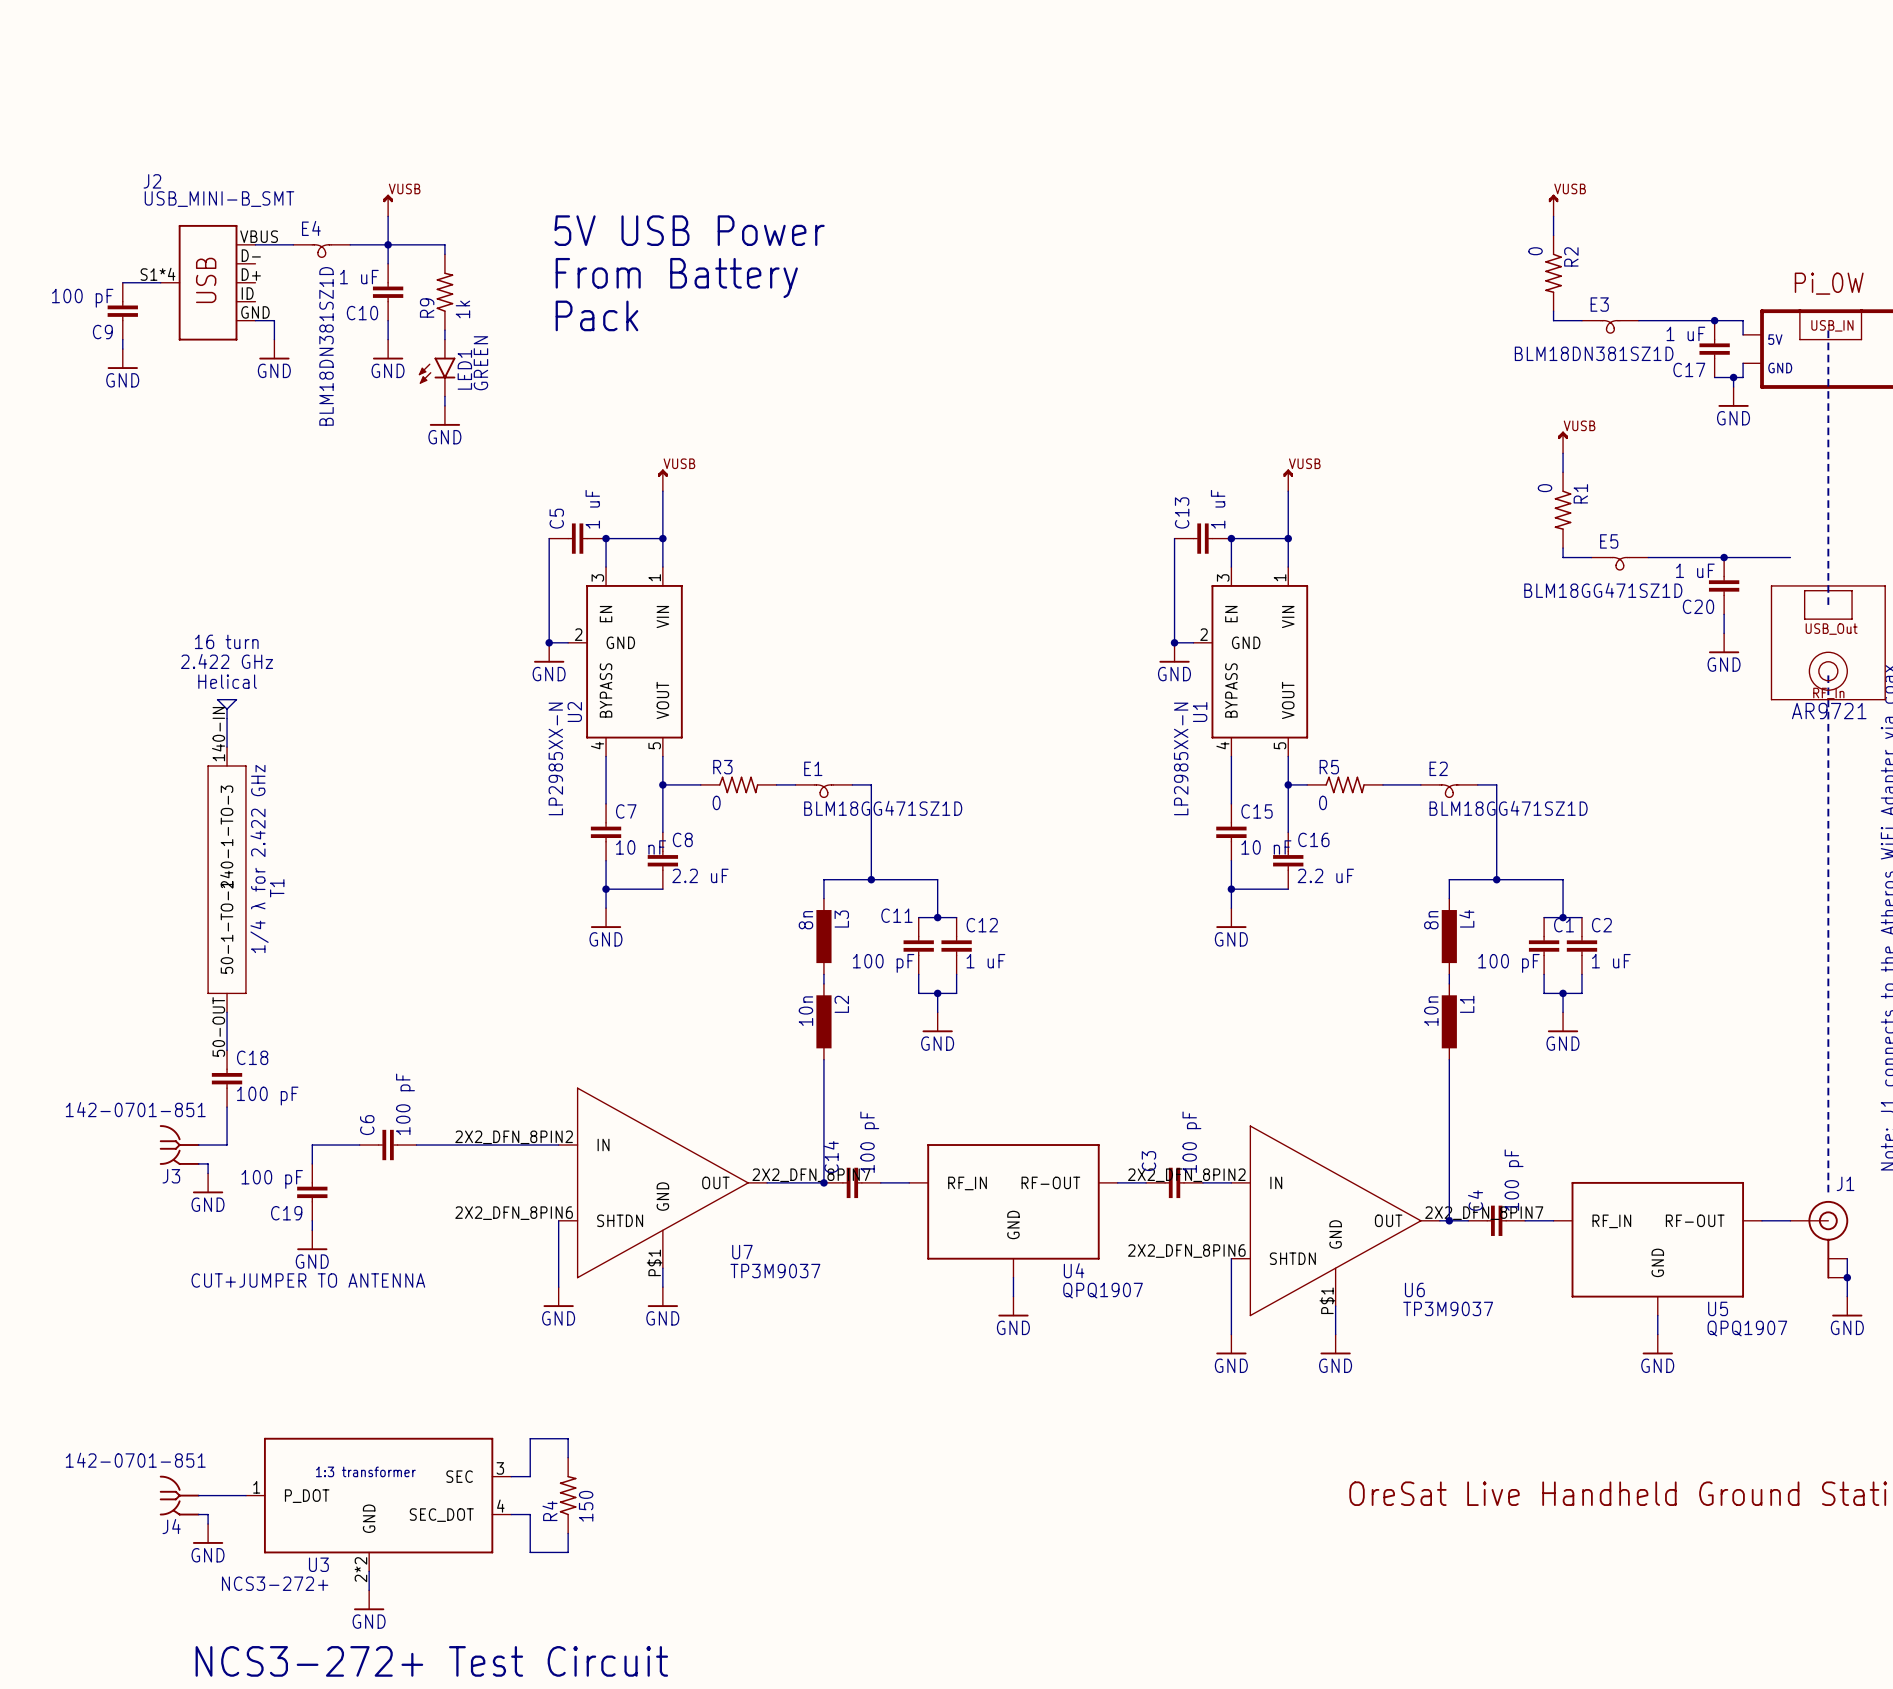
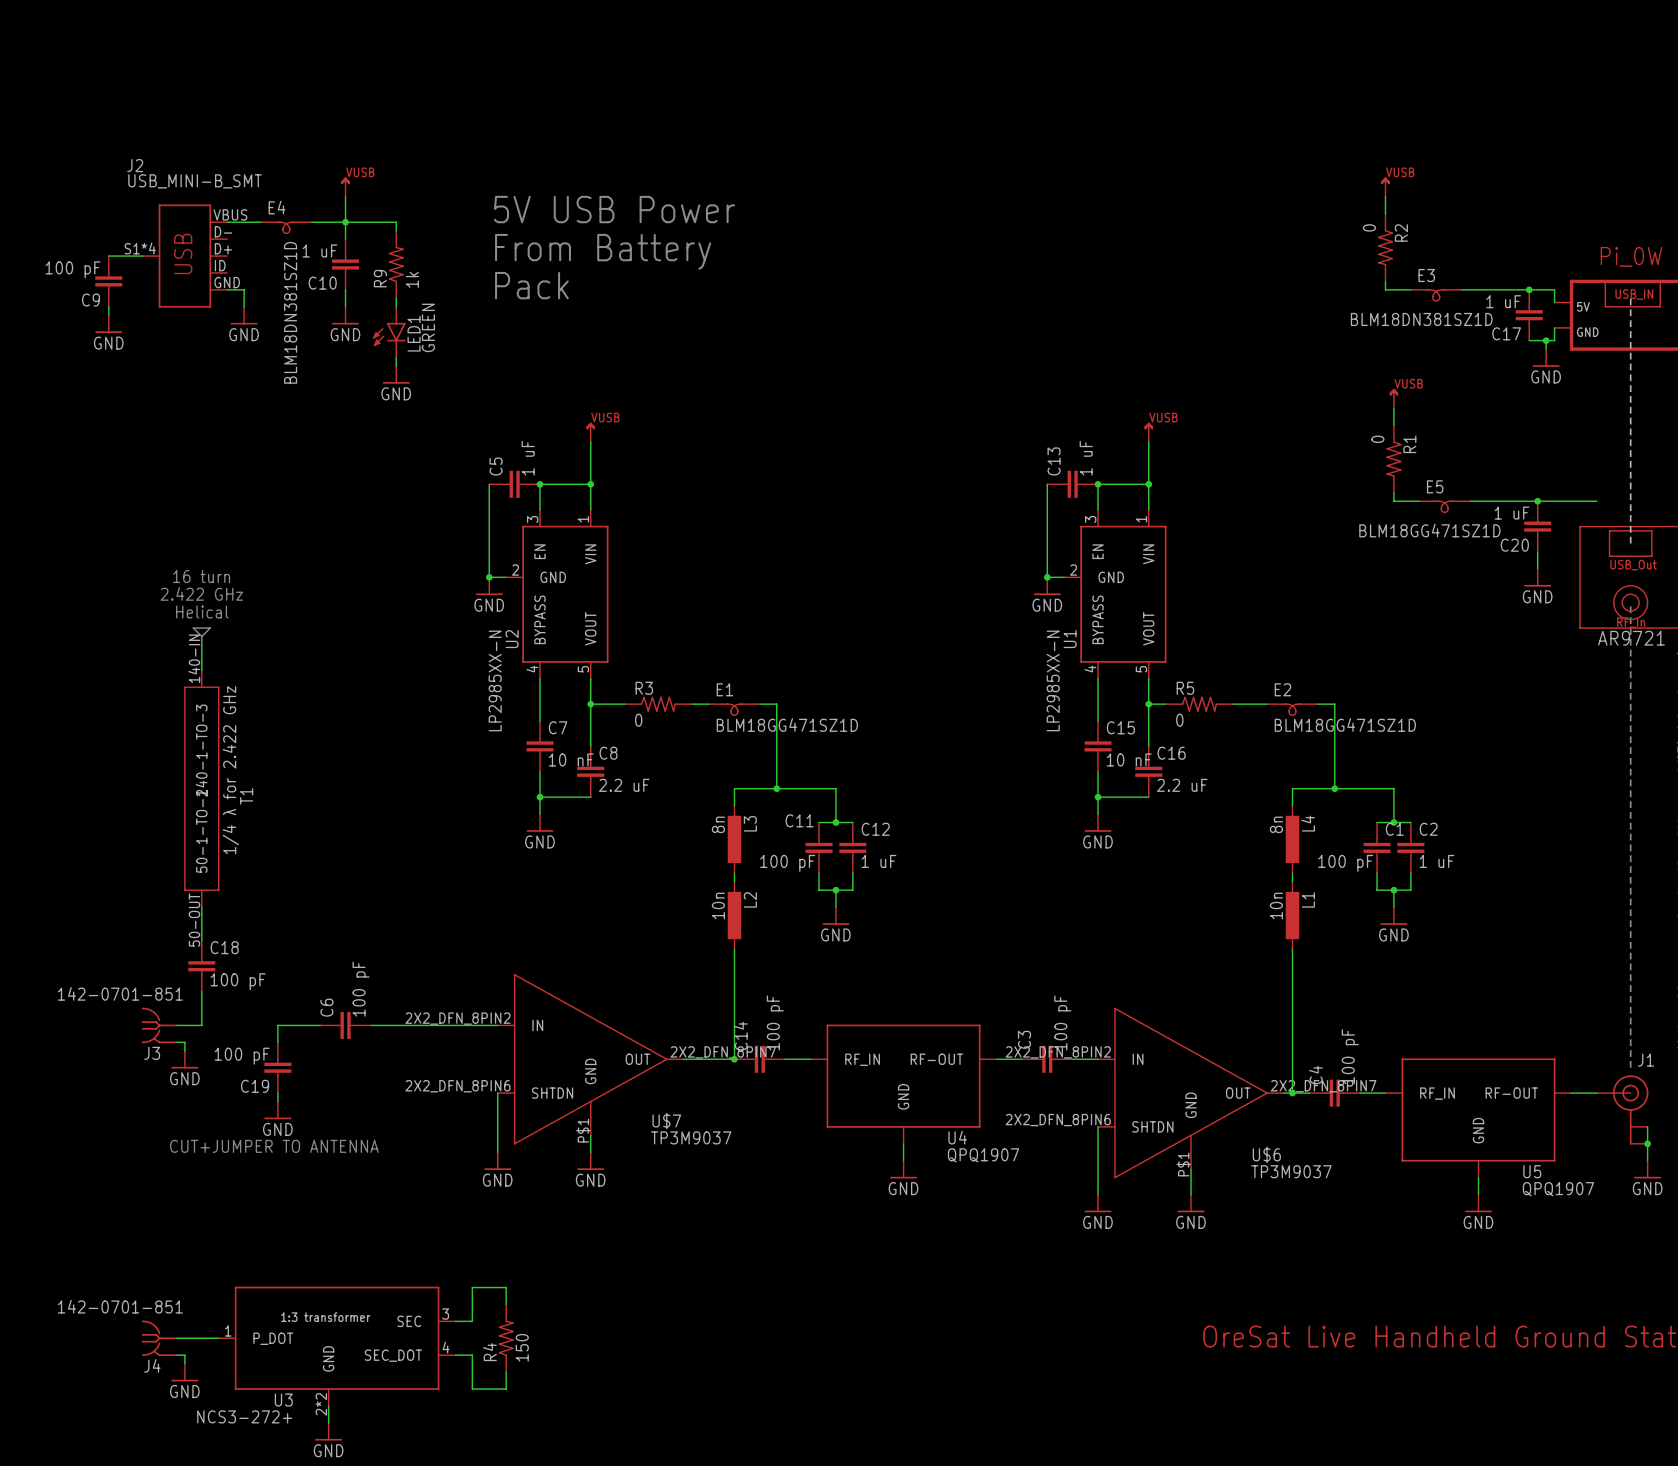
U7 name: U7 (742, 1252) -> U$7 (666, 1120)
U6 name: U6 (1414, 1289) -> U$6 (1266, 1154)

